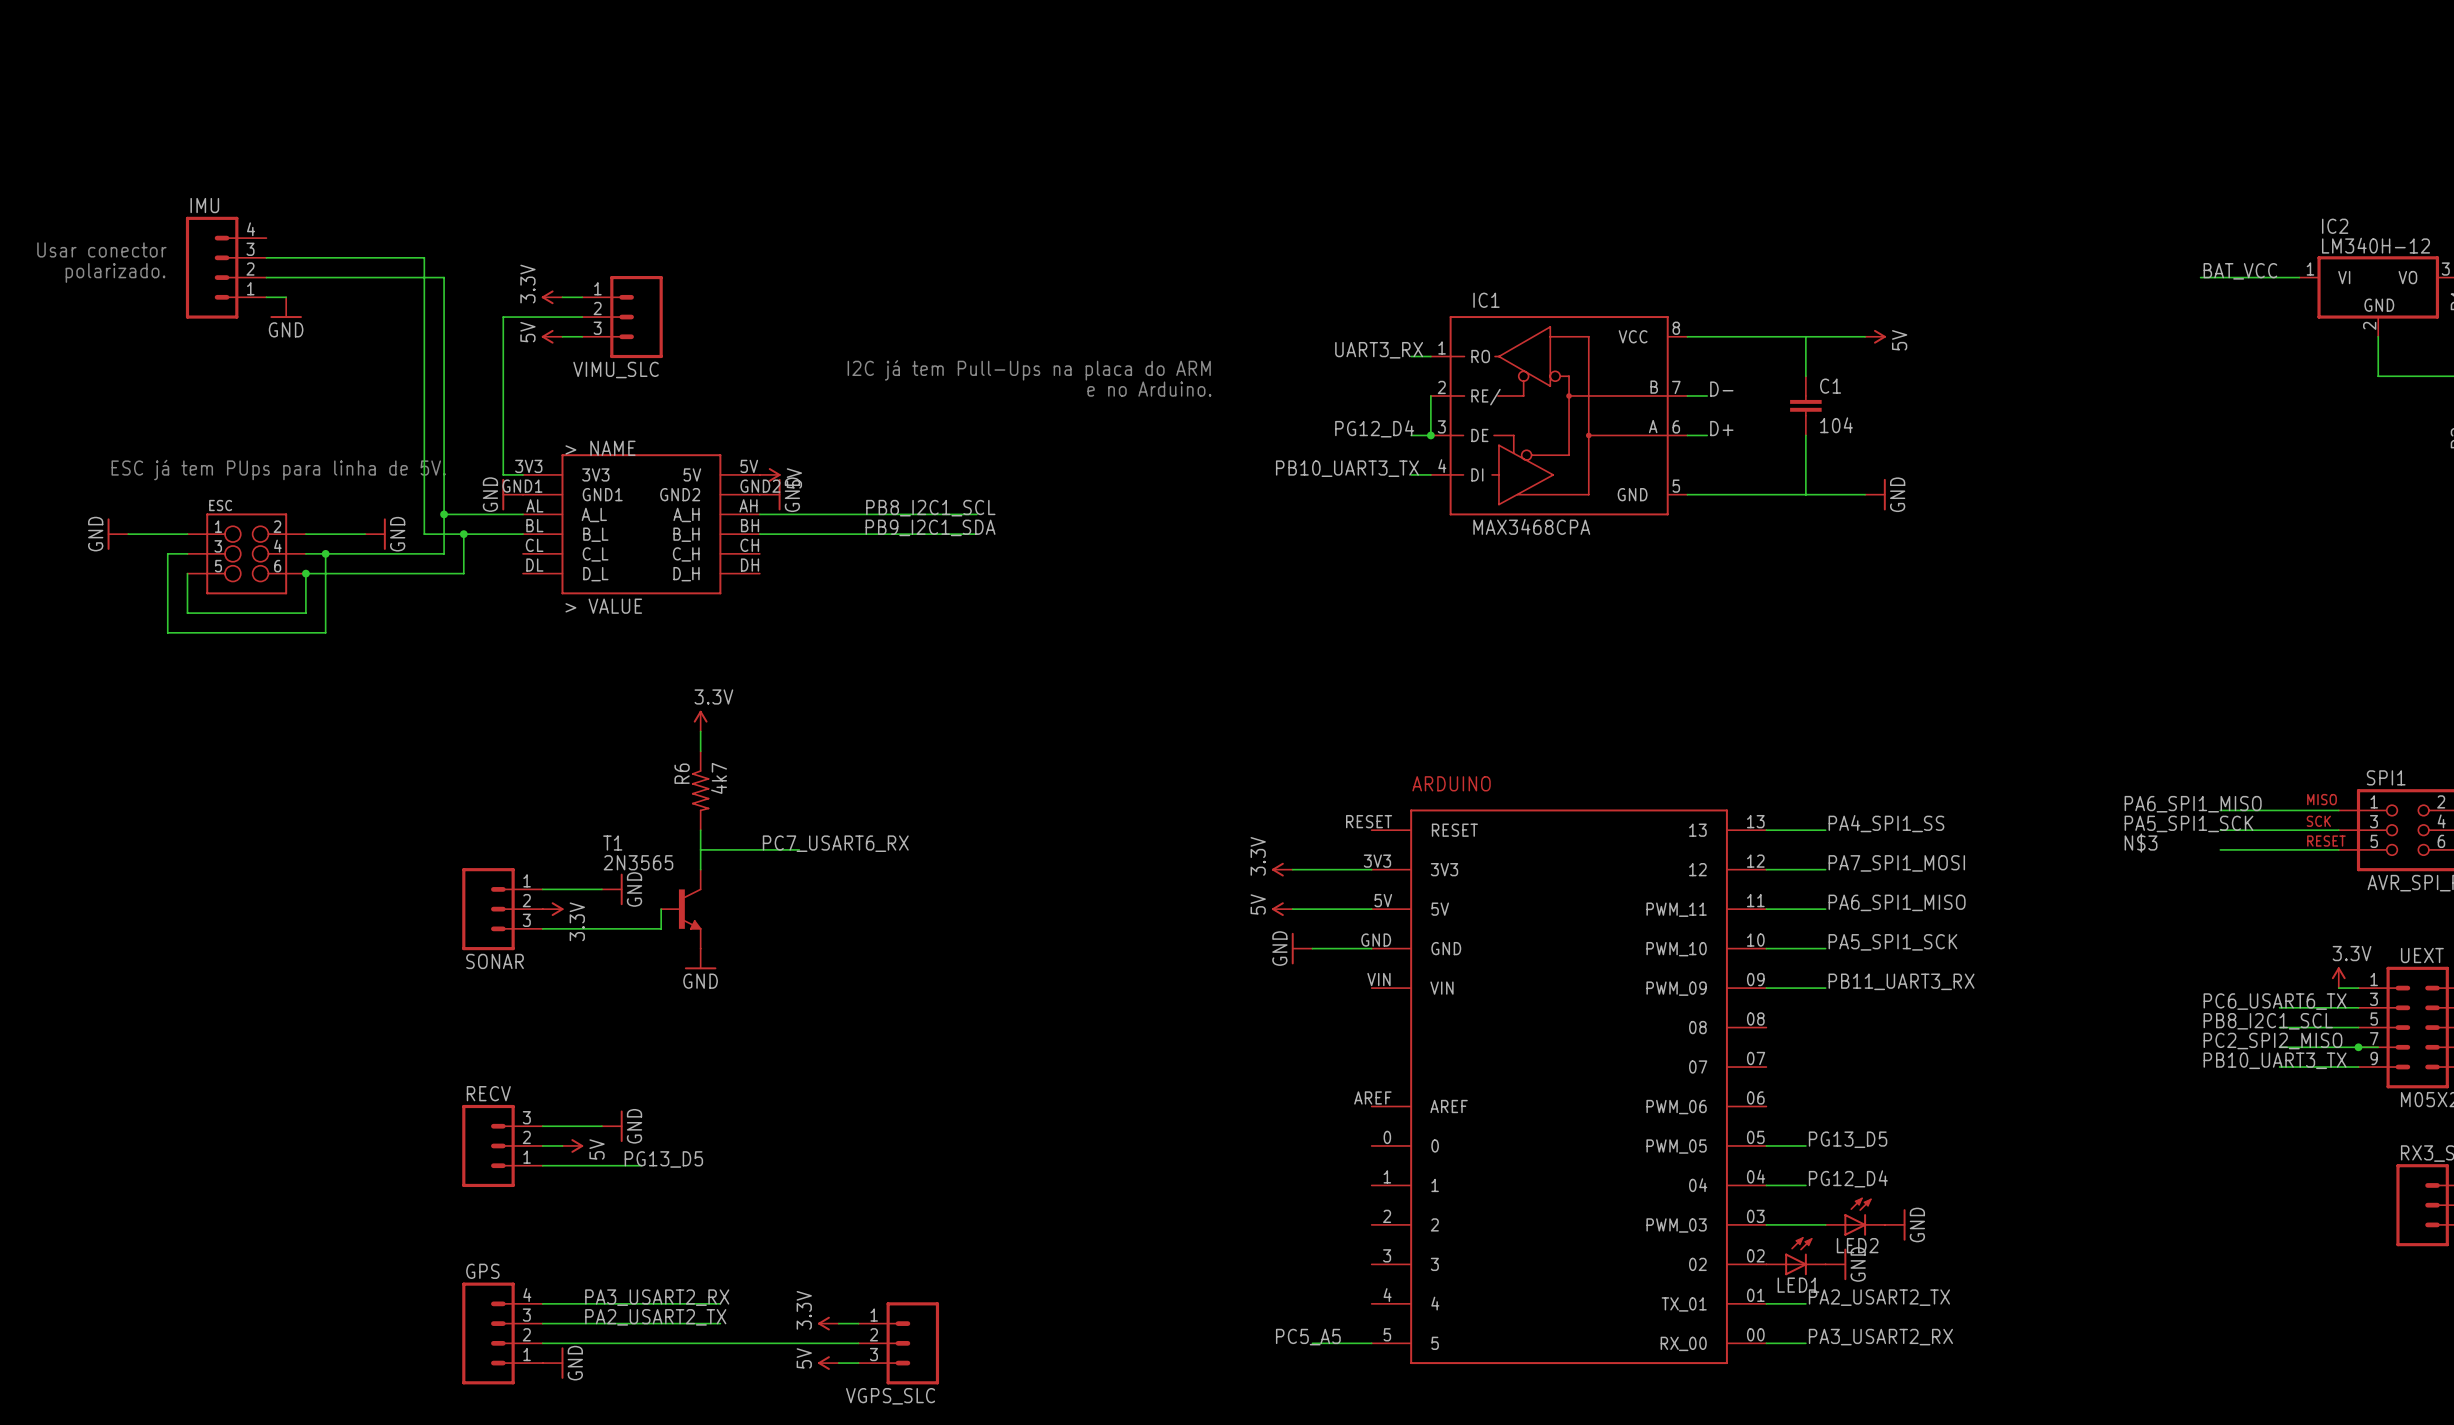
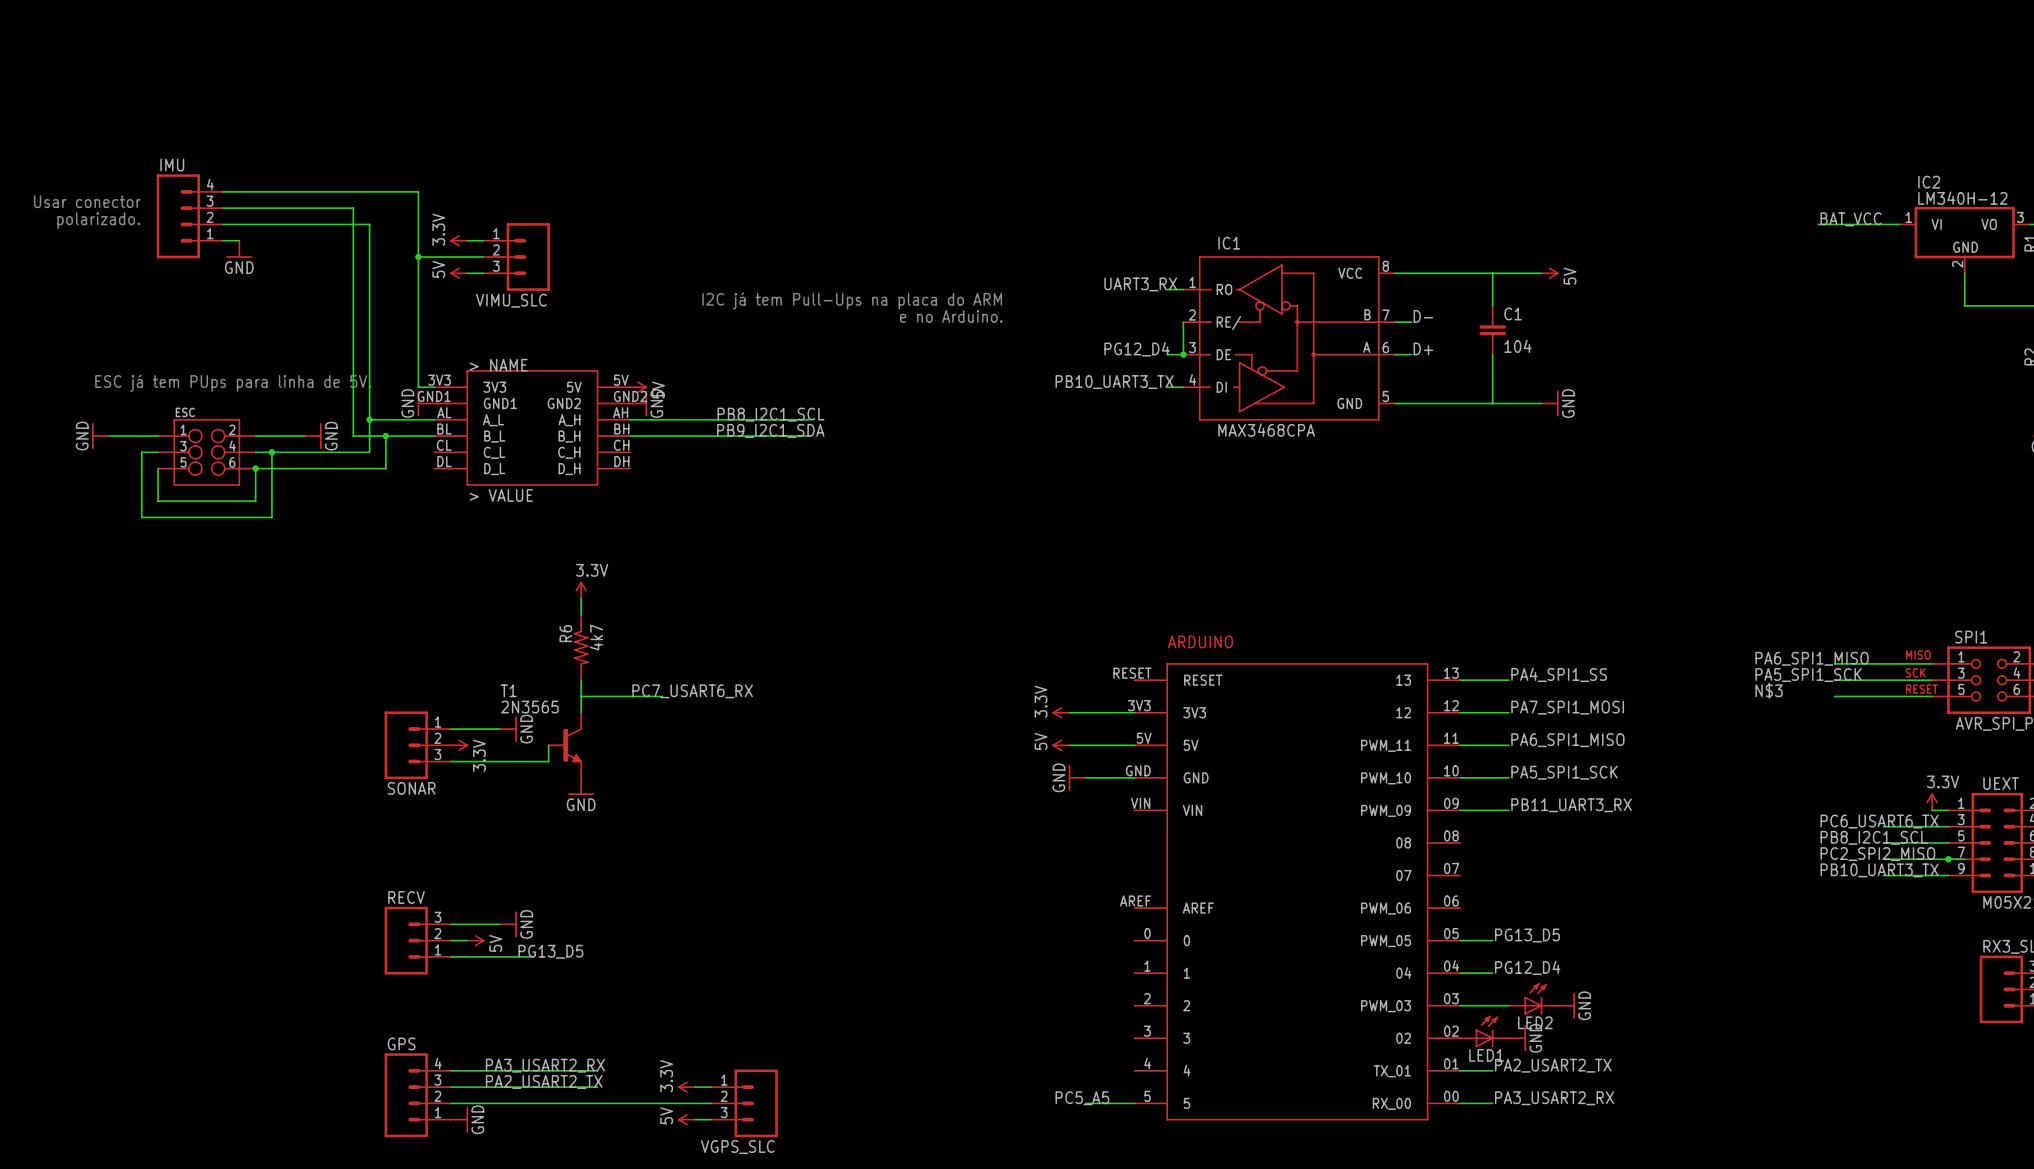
wire: none -> (223, 191) (418, 191) (418, 257)
junction: none -> (418, 257)

